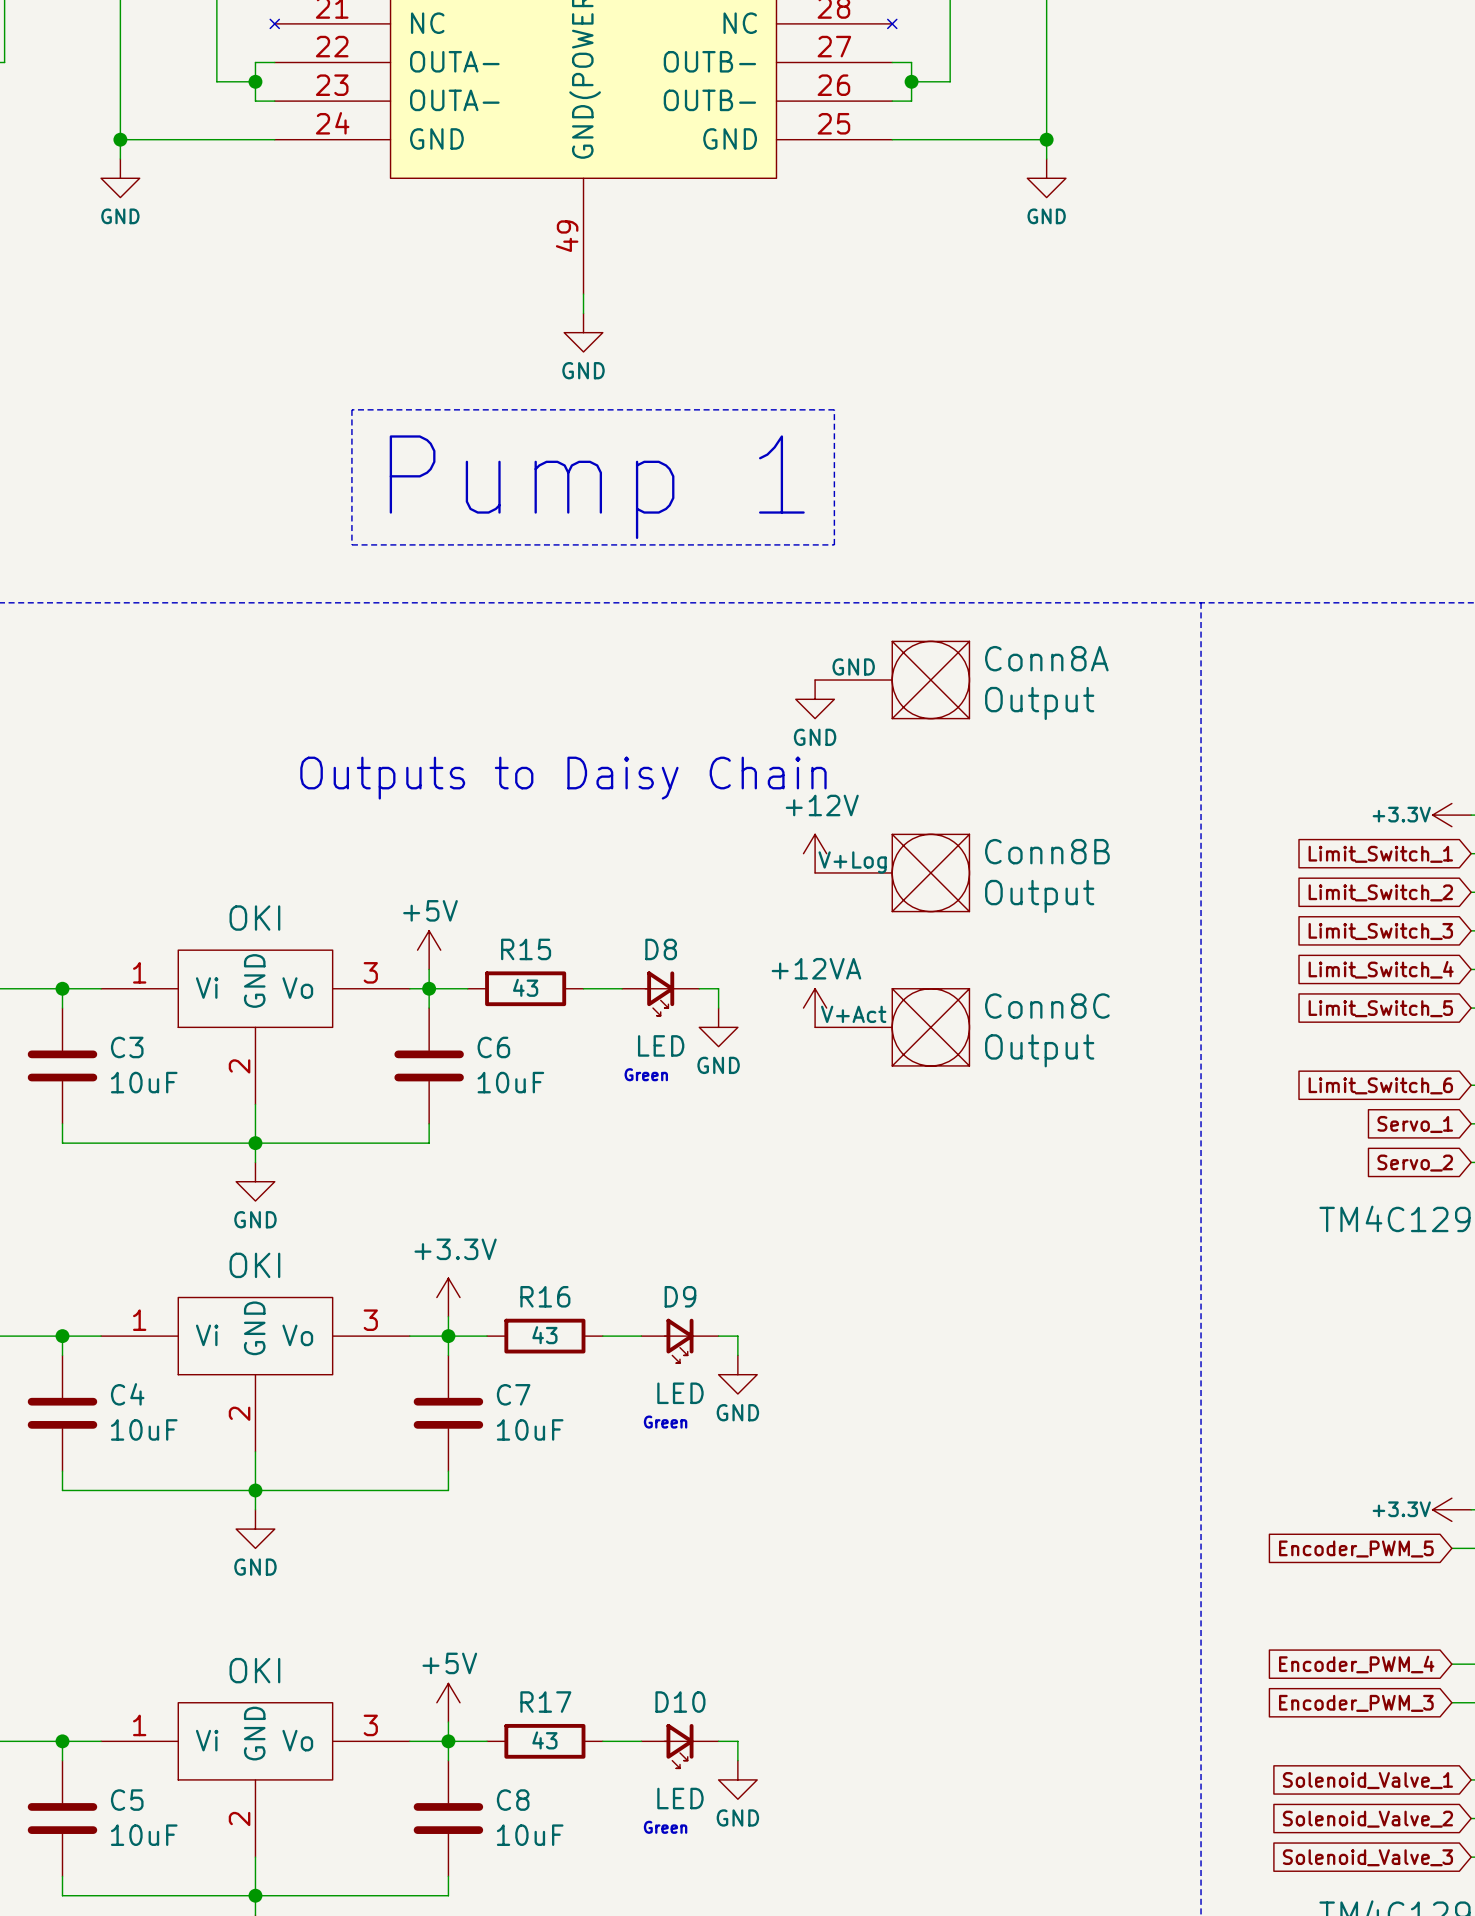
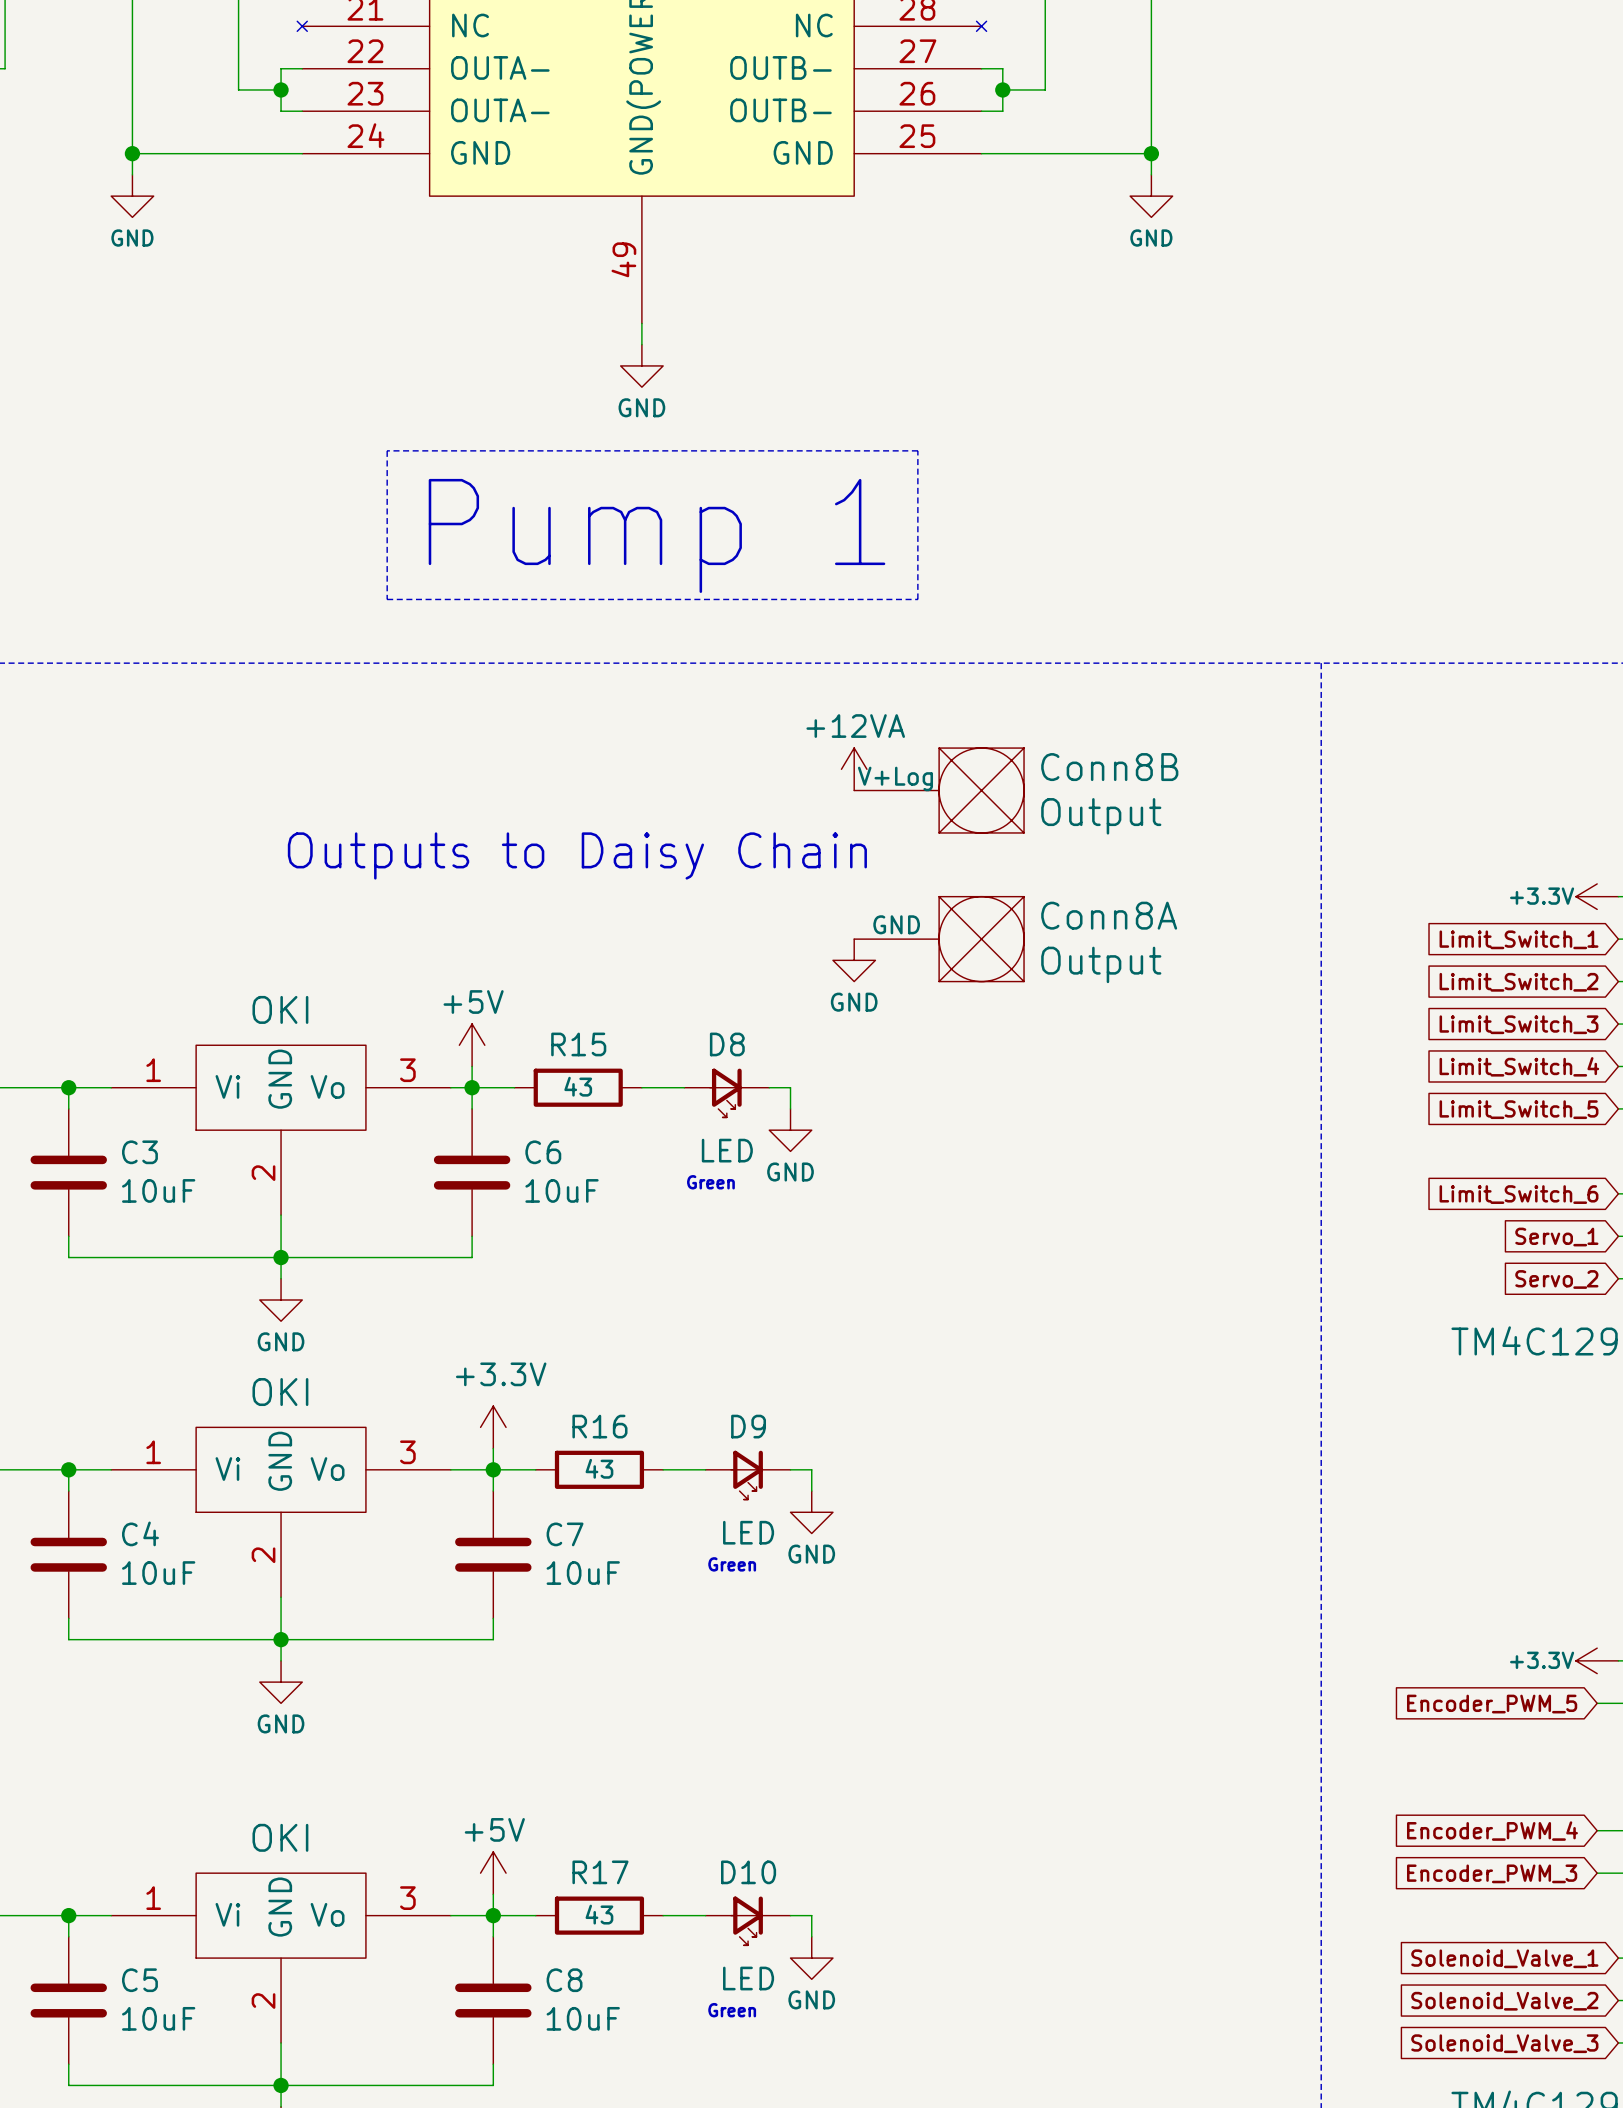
Conn8A position: (892, 680) -> (939, 939)
power symbol position: GND (815, 699) -> GND (854, 960)
text position: Outputs to Daisy Chain (563, 778) -> Outputs to Daisy Chain (577, 855)
power symbol: +12V (815, 853) -> none
Conn8B position: (892, 872) -> (939, 790)
power symbol position: +12VA (815, 1008) -> +12VA (854, 769)
Conn8C: Output (892, 1027) -> none

